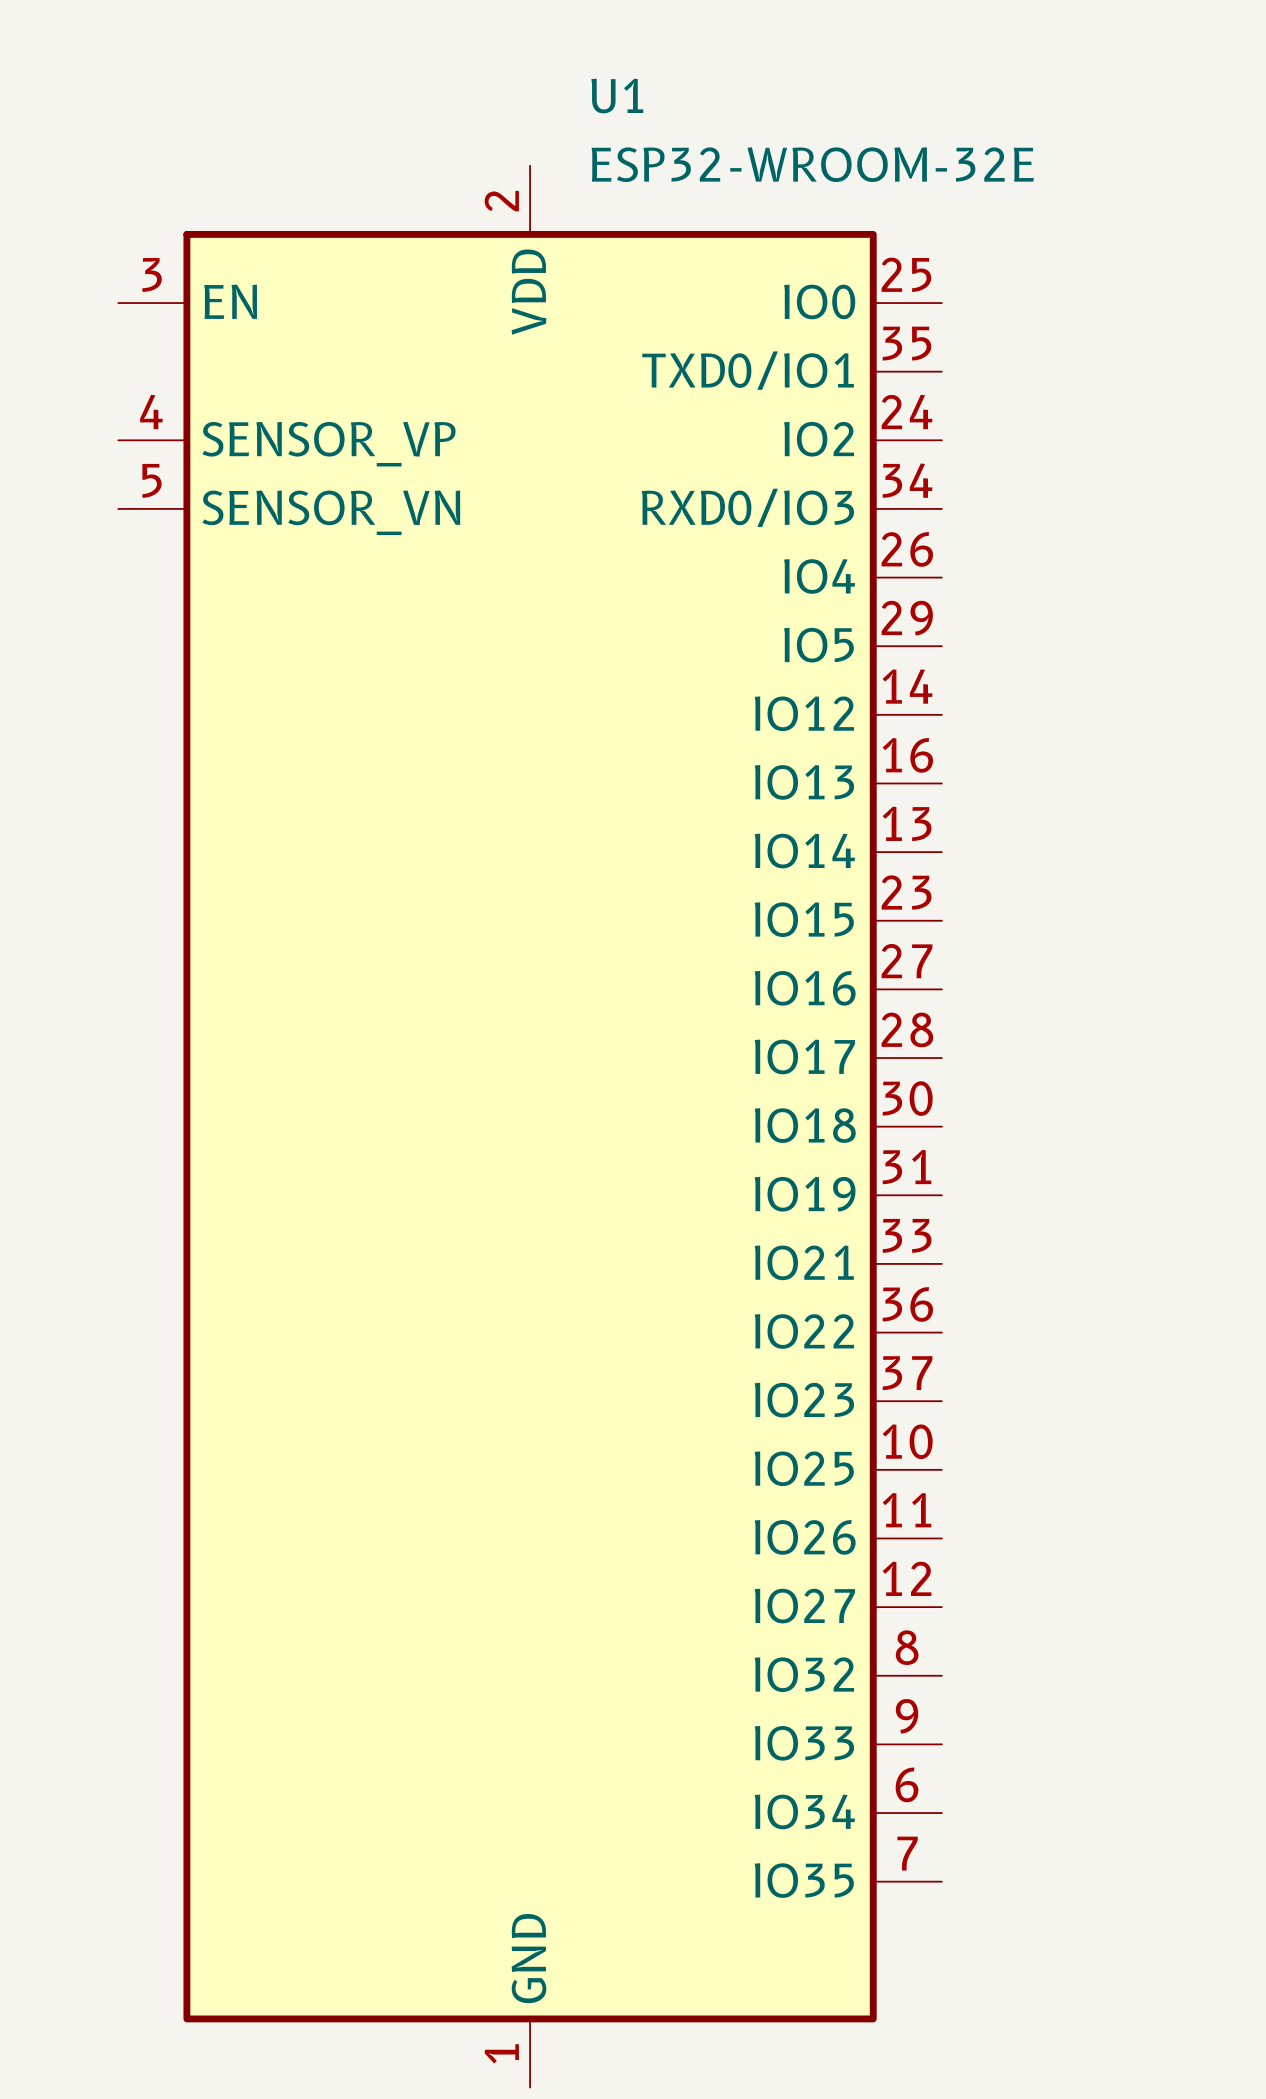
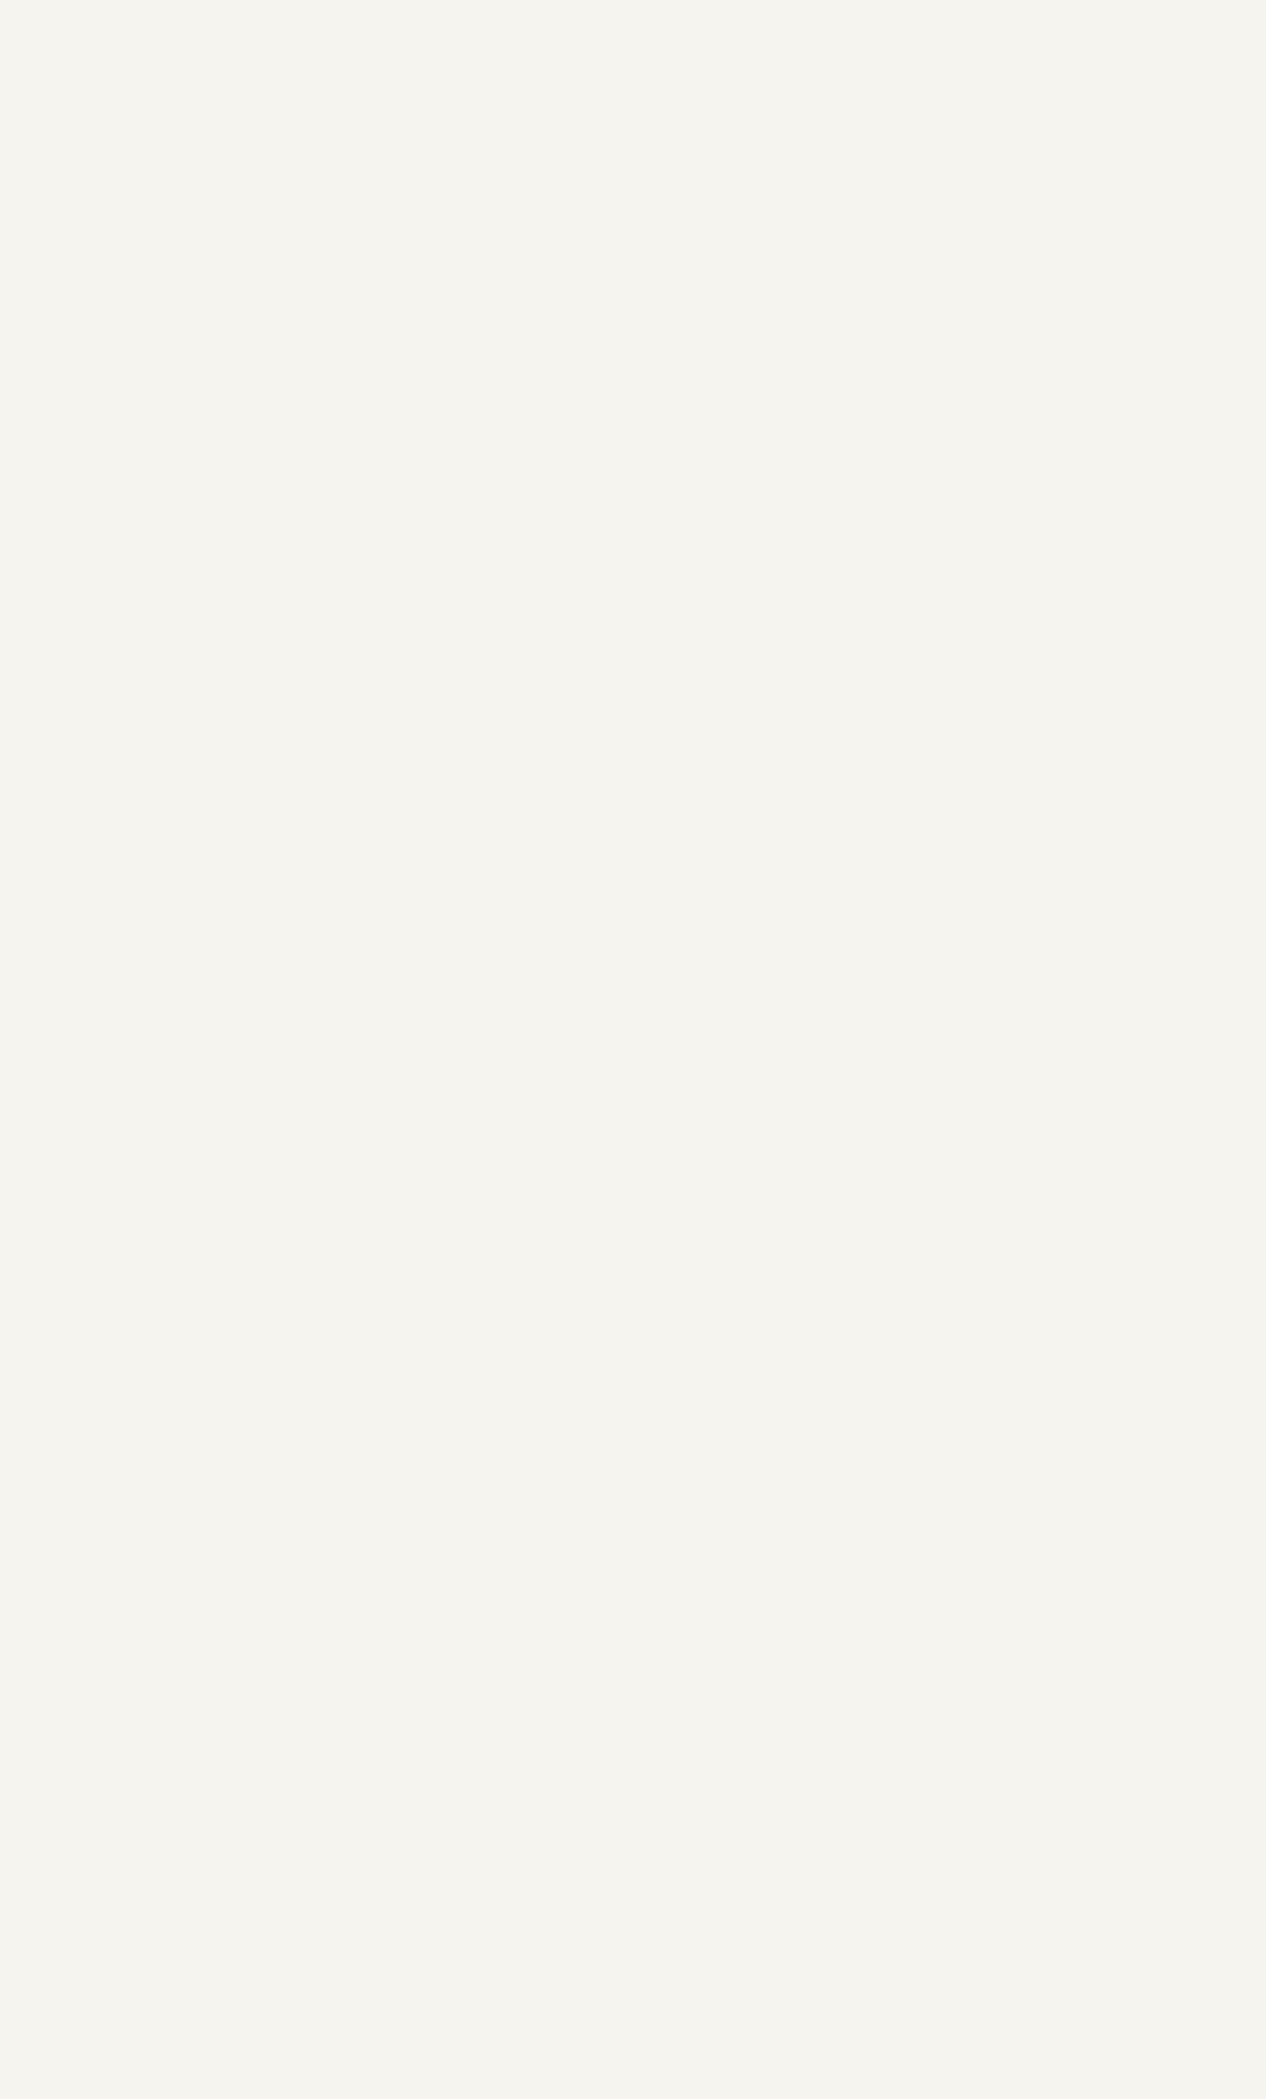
U1: ESP32-WROOM-32E (530, 1126) -> none

